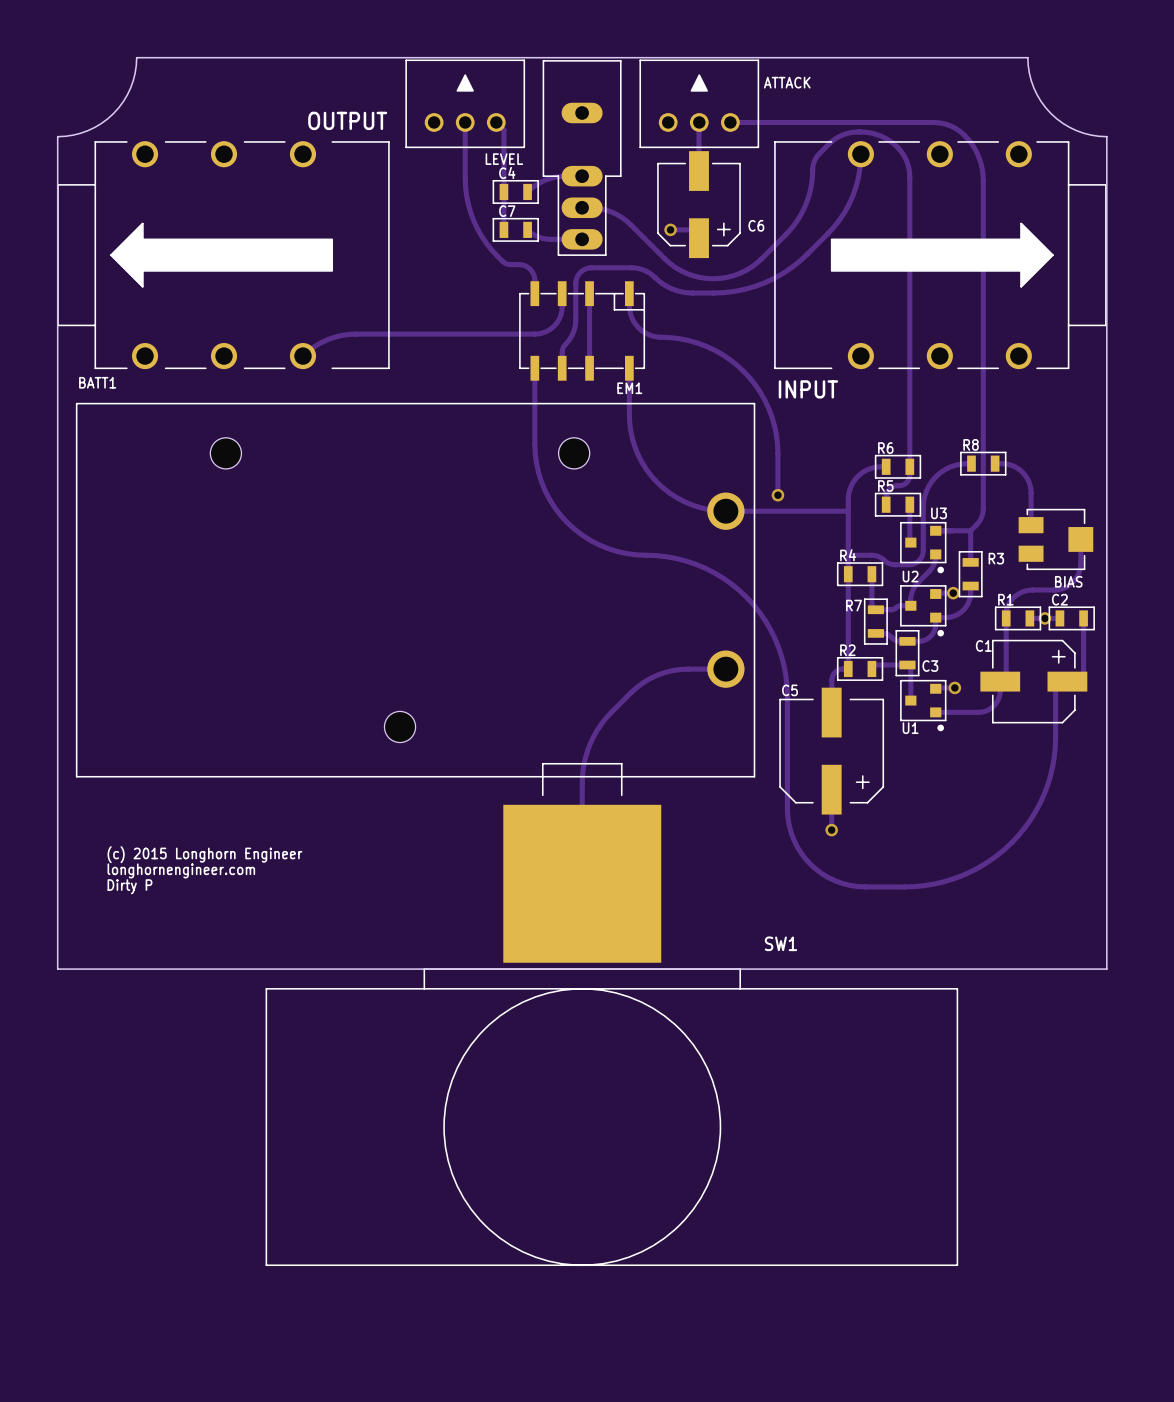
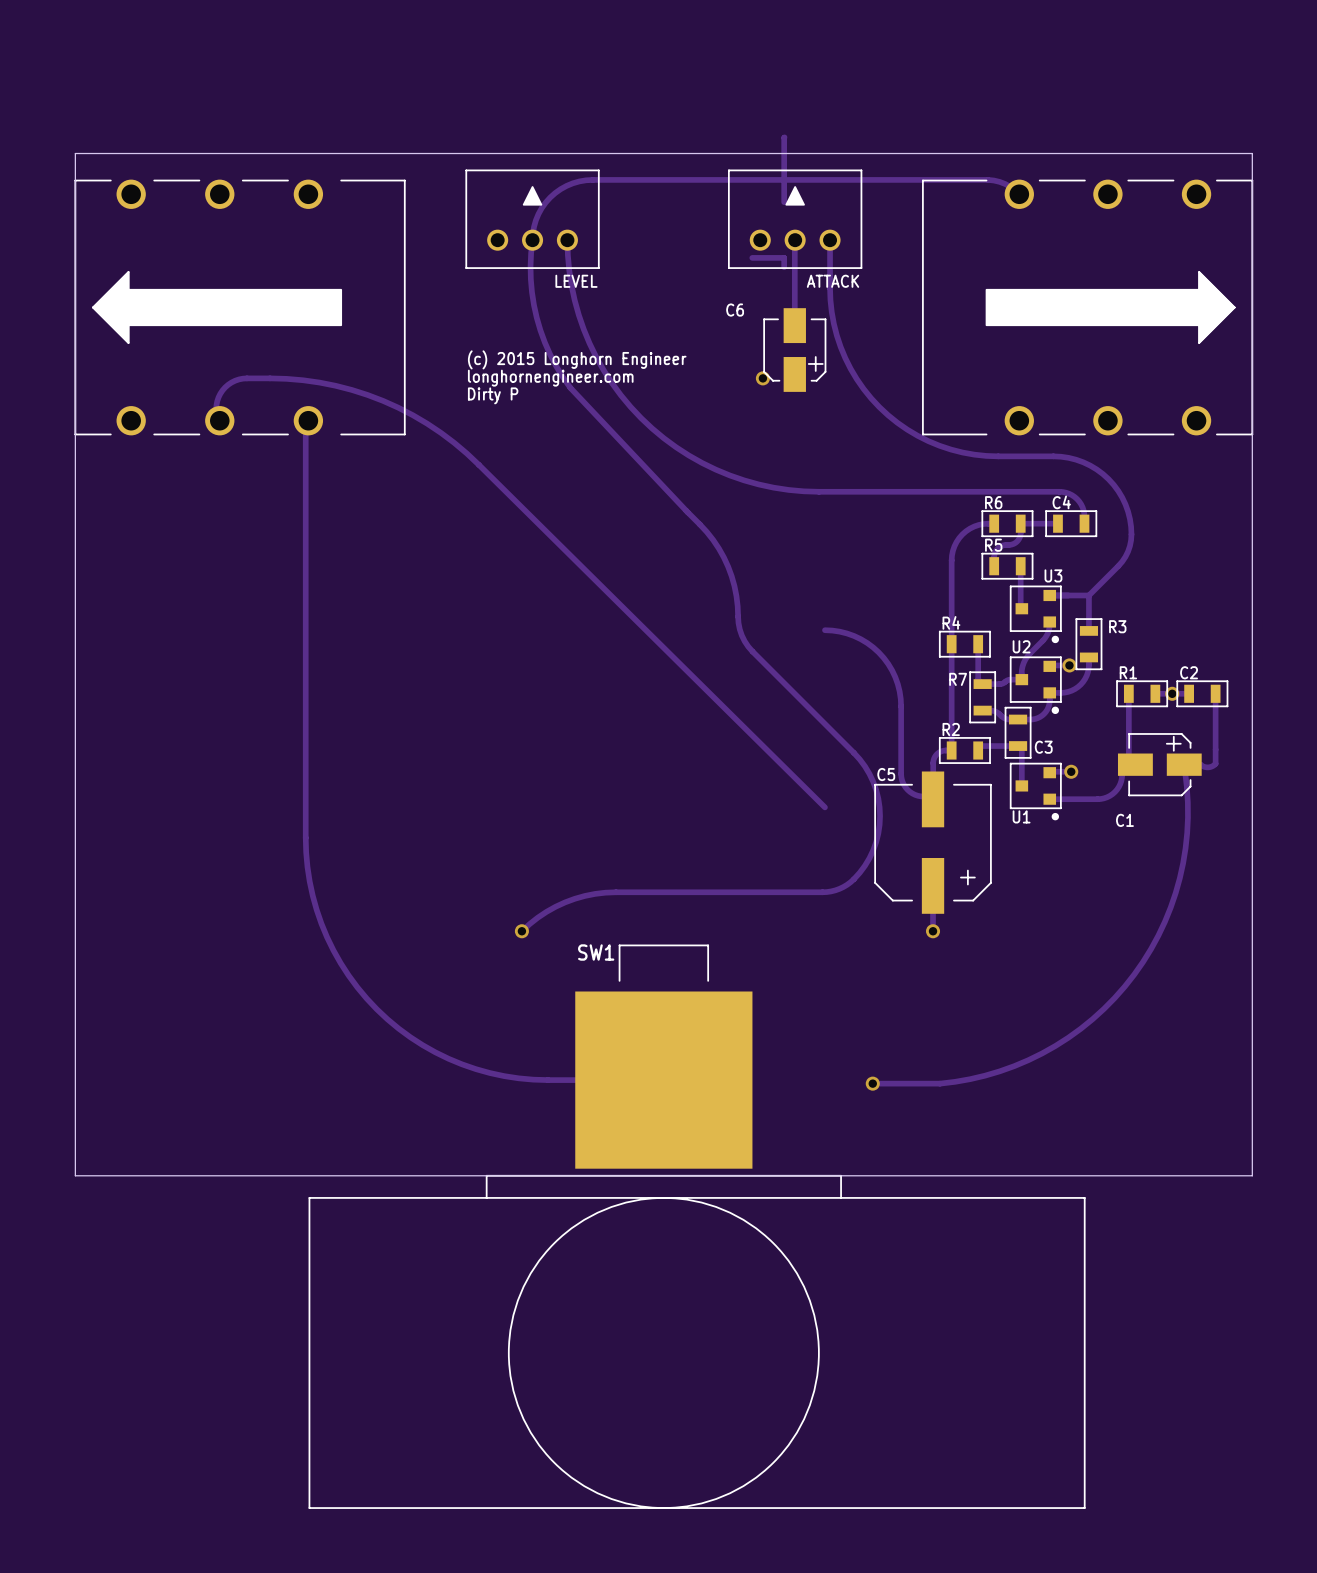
board edge: (136, 57) (1027, 57) (1029, 73) (1033, 87) (1041, 101) (1050, 113) (1062, 123) (1076, 130) (1091, 135) (1106, 136) (1106, 969) (57, 969) (57, 136) (73, 135) (87, 130) (101, 123) (113, 113) (123, 101) (130, 87) (135, 73) (136, 57) -> (75, 153) (75, 1175) (1252, 1175) (1252, 153) (75, 153)
ATTACK name position: ATTACK (787, 82) -> ATTACK (833, 281)
LEVEL position: (465, 103) -> (532, 219)
ATTACK position: (699, 103) -> (795, 219)
track: (465, 122) (465, 186) (473, 220) (486, 243) (503, 261) (508, 264) (523, 265) (531, 270) (534, 278) (534, 293) -> none
track: (496, 122) (503, 130) (503, 229) -> none
track: (730, 122) (939, 122) (955, 128) (972, 145) (980, 161) (983, 180) (983, 508) (981, 517) (976, 524) -> (830, 240) (830, 300) (836, 335) (845, 357) (856, 379) (871, 398) (888, 415) (917, 435) (950, 449) (986, 455) (1068, 457) (1090, 465) (1113, 484) (1128, 511) (1131, 540) (1128, 551) (1122, 561) (1095, 588)
C6 footprint: [657, 151, 741, 259] -> [763, 308, 827, 392]
track: (860, 154) (855, 188) (839, 220) (799, 261) (782, 273) (764, 282) (734, 291) (687, 292) (667, 286) (649, 273) (638, 268) (591, 267) (581, 271) (575, 281) (574, 328) (562, 349) (562, 368) -> none
part: (582, 158) -> none
track: none -> (1019, 194) (1005, 184) (988, 179) (592, 179) (579, 181) (566, 185) (555, 193) (541, 208) (535, 220) (532, 233) (530, 266) (531, 292) (540, 330) (556, 366) (570, 387) (713, 540) (723, 557) (731, 576) (736, 596) (739, 629) (744, 641) (752, 651) (859, 759) (873, 781) (878, 798) (880, 816) (876, 842) (864, 865) (850, 882) (835, 890) (822, 892) (595, 893) (574, 898) (555, 906) (537, 917) (521, 931)
track: (582, 176) (550, 178) (540, 182) (527, 191) -> none
C4 position: (515, 191) -> (1071, 523)
track: (582, 207) (600, 208) (621, 217) (669, 263) (680, 270) (706, 278) (726, 277) (745, 270) (756, 263) (795, 223) (808, 198) (814, 161) (832, 141) (846, 133) (860, 131) (875, 134) (893, 143) (906, 160) (909, 176) (909, 466) -> (1057, 523) (1020, 523)
track: none -> (567, 240) (571, 285) (578, 315) (589, 343) (603, 370) (620, 395) (652, 428) (676, 447) (702, 462) (729, 475) (758, 484) (803, 491) (1062, 492) (1071, 495) (1079, 501) (1083, 510) (1084, 523)
track: none -> (795, 240) (794, 325)
C6 name position: C6 (756, 225) -> C6 (735, 310)
C7: (515, 229) -> none
track: (527, 229) (538, 236) (546, 239) (582, 239) -> none
via: (670, 229) -> none
OUTPUT: (223, 255) -> none
INPUT: (940, 255) -> none
part: none -> (240, 307)
part: none -> (1087, 307)
track: (562, 293) (561, 310) (558, 320) (551, 328) (541, 333) (348, 334) (327, 339) (302, 356) -> none
track: (589, 293) (589, 368) -> none
track: (629, 293) (630, 313) (633, 321) (641, 330) (652, 336) (688, 340) (714, 350) (737, 365) (755, 385) (765, 401) (774, 426) (777, 444) (777, 495) -> none
drawing: none -> [467, 350, 687, 405]
EM1: (582, 330) -> none
via: none -> (762, 378)
track: (534, 368) (536, 463) (545, 491) (560, 515) (582, 535) (608, 548) (626, 553) (676, 558) (713, 572) (746, 596) (770, 628) (781, 656) (787, 686) (788, 824) (800, 852) (822, 873) (835, 881) (857, 886) (924, 885) (943, 881) (971, 871) (1004, 849) (1030, 819) (1047, 785) (1055, 746) (1055, 681) -> (872, 1083) (940, 1083) (970, 1079) (999, 1071) (1042, 1053) (1068, 1037) (1092, 1019) (1114, 998) (1134, 974) (1151, 948) (1164, 921) (1175, 893) (1183, 863) (1187, 833) (1187, 802) (1184, 764)
track: (629, 368) (630, 431) (635, 447) (646, 469) (663, 488) (684, 502) (700, 507) (725, 511) -> none
track: none -> (219, 420) (216, 409) (217, 401) (222, 390) (228, 384) (242, 378) (269, 378) (303, 380) (351, 389) (383, 400) (427, 423) (454, 442) (478, 464) (824, 807)
track: none -> (308, 420) (305, 421) (306, 852) (309, 881) (316, 909) (333, 950) (357, 987) (387, 1019) (422, 1045) (462, 1064) (504, 1076) (533, 1079) (663, 1080)
track: (971, 463) (955, 465) (945, 469) (929, 485) (923, 501) (923, 552) (917, 561) (910, 564) (893, 564) (876, 555) (848, 555) -> none
R8: (983, 463) -> none
track: (995, 463) (1012, 465) (1027, 478) (1030, 489) (1031, 525) -> none
via: (777, 495) -> none
track: (725, 511) (848, 511) -> none
BIAS: (1055, 539) -> none
track: (1080, 539) (1080, 566) (1073, 582) (1061, 589) (1029, 590) (1019, 593) (1009, 603) (1006, 618) -> none
track: none -> (824, 630) (847, 633) (860, 639) (878, 652) (888, 664) (895, 677) (900, 698) (901, 779) (905, 787) (912, 793) (930, 796) (933, 799)
BATT1: (415, 590) -> none
C1 footprint: [980, 639, 1088, 724] -> [1117, 733, 1202, 797]
C1 name position: C1 (983, 645) -> C1 (1124, 820)
track: (725, 669) (680, 669) (657, 675) (636, 687) (601, 724) (589, 744) (583, 767) (582, 883) -> none
via: none -> (521, 931)
drawing: [107, 846, 303, 895] -> none
SW1 name position: SW1 (780, 943) -> SW1 (596, 952)
via: none -> (872, 1083)
SW1 position: (611, 1014) -> (697, 1226)

